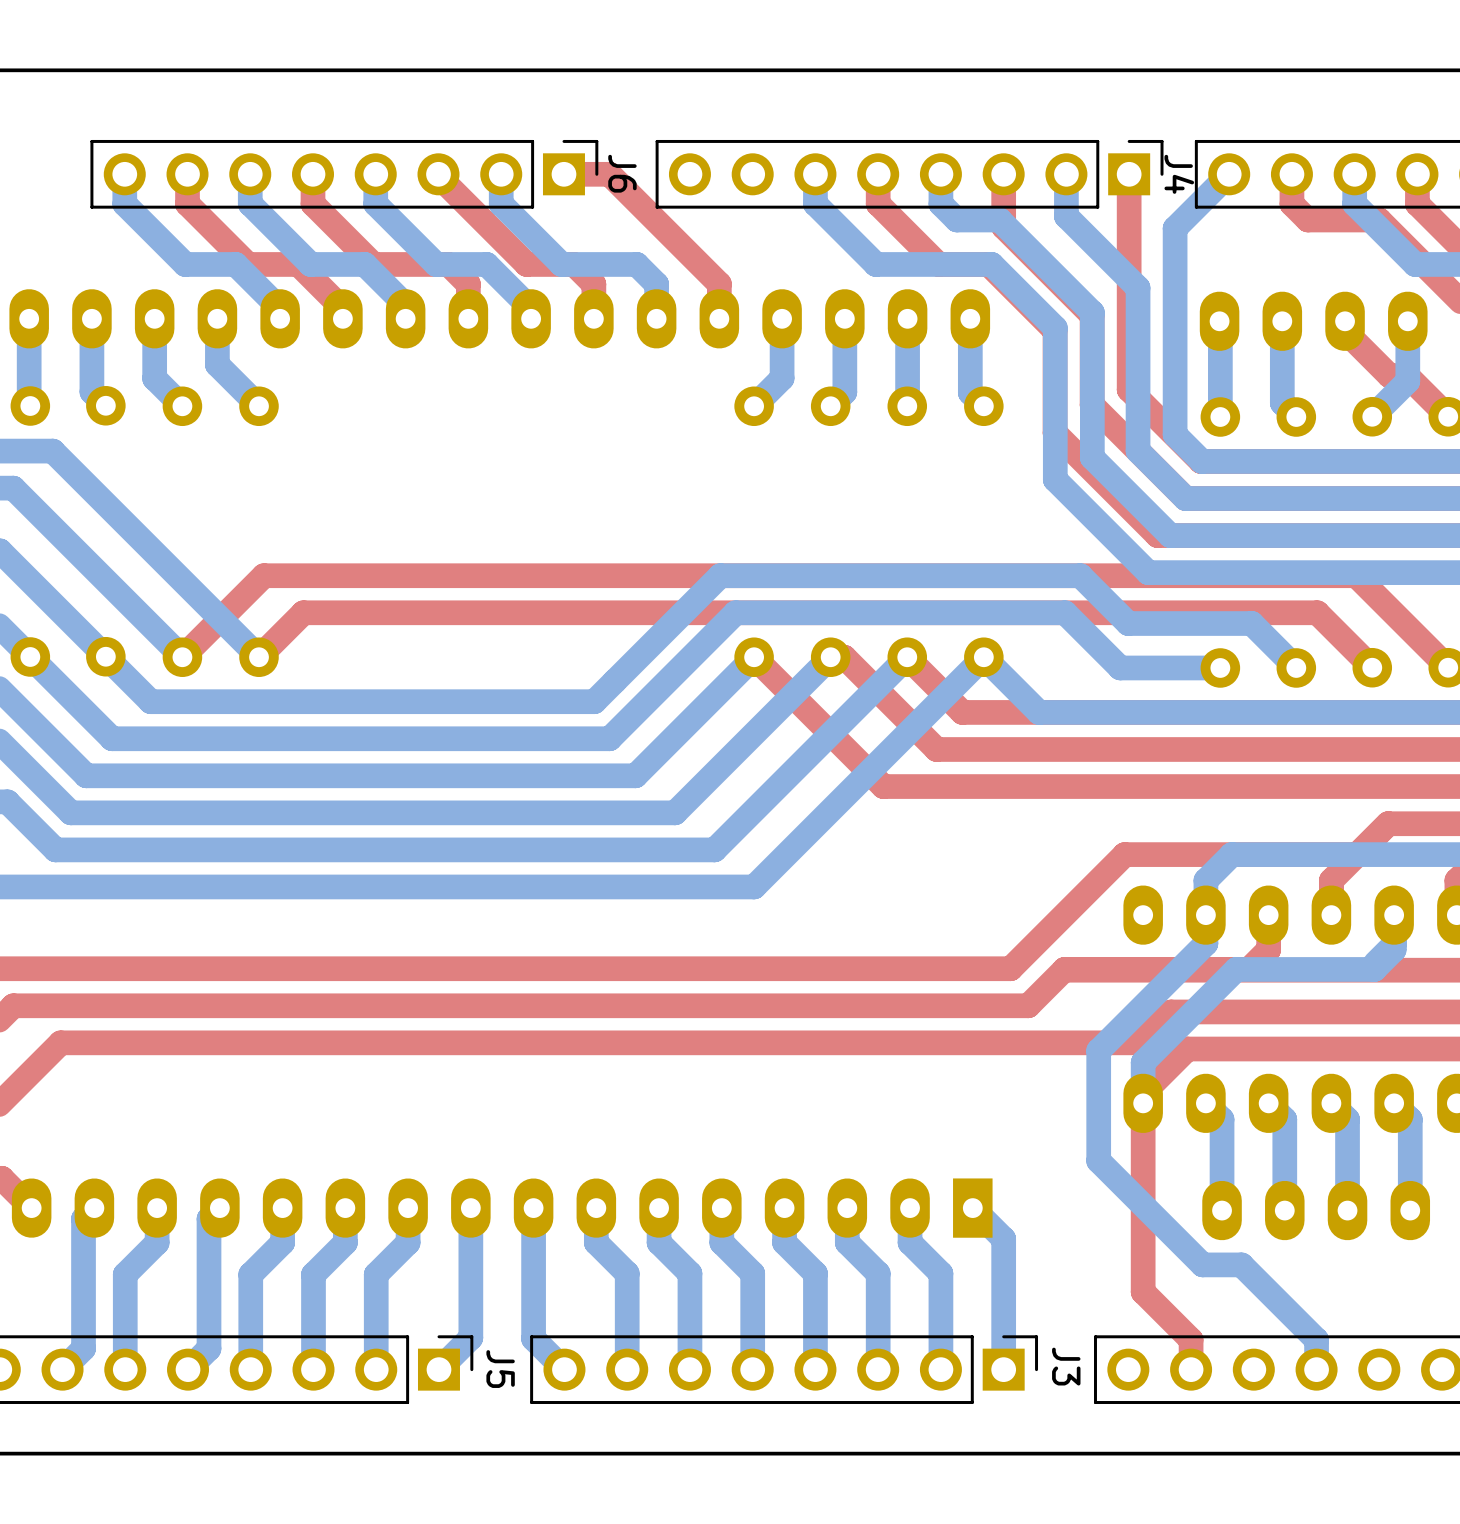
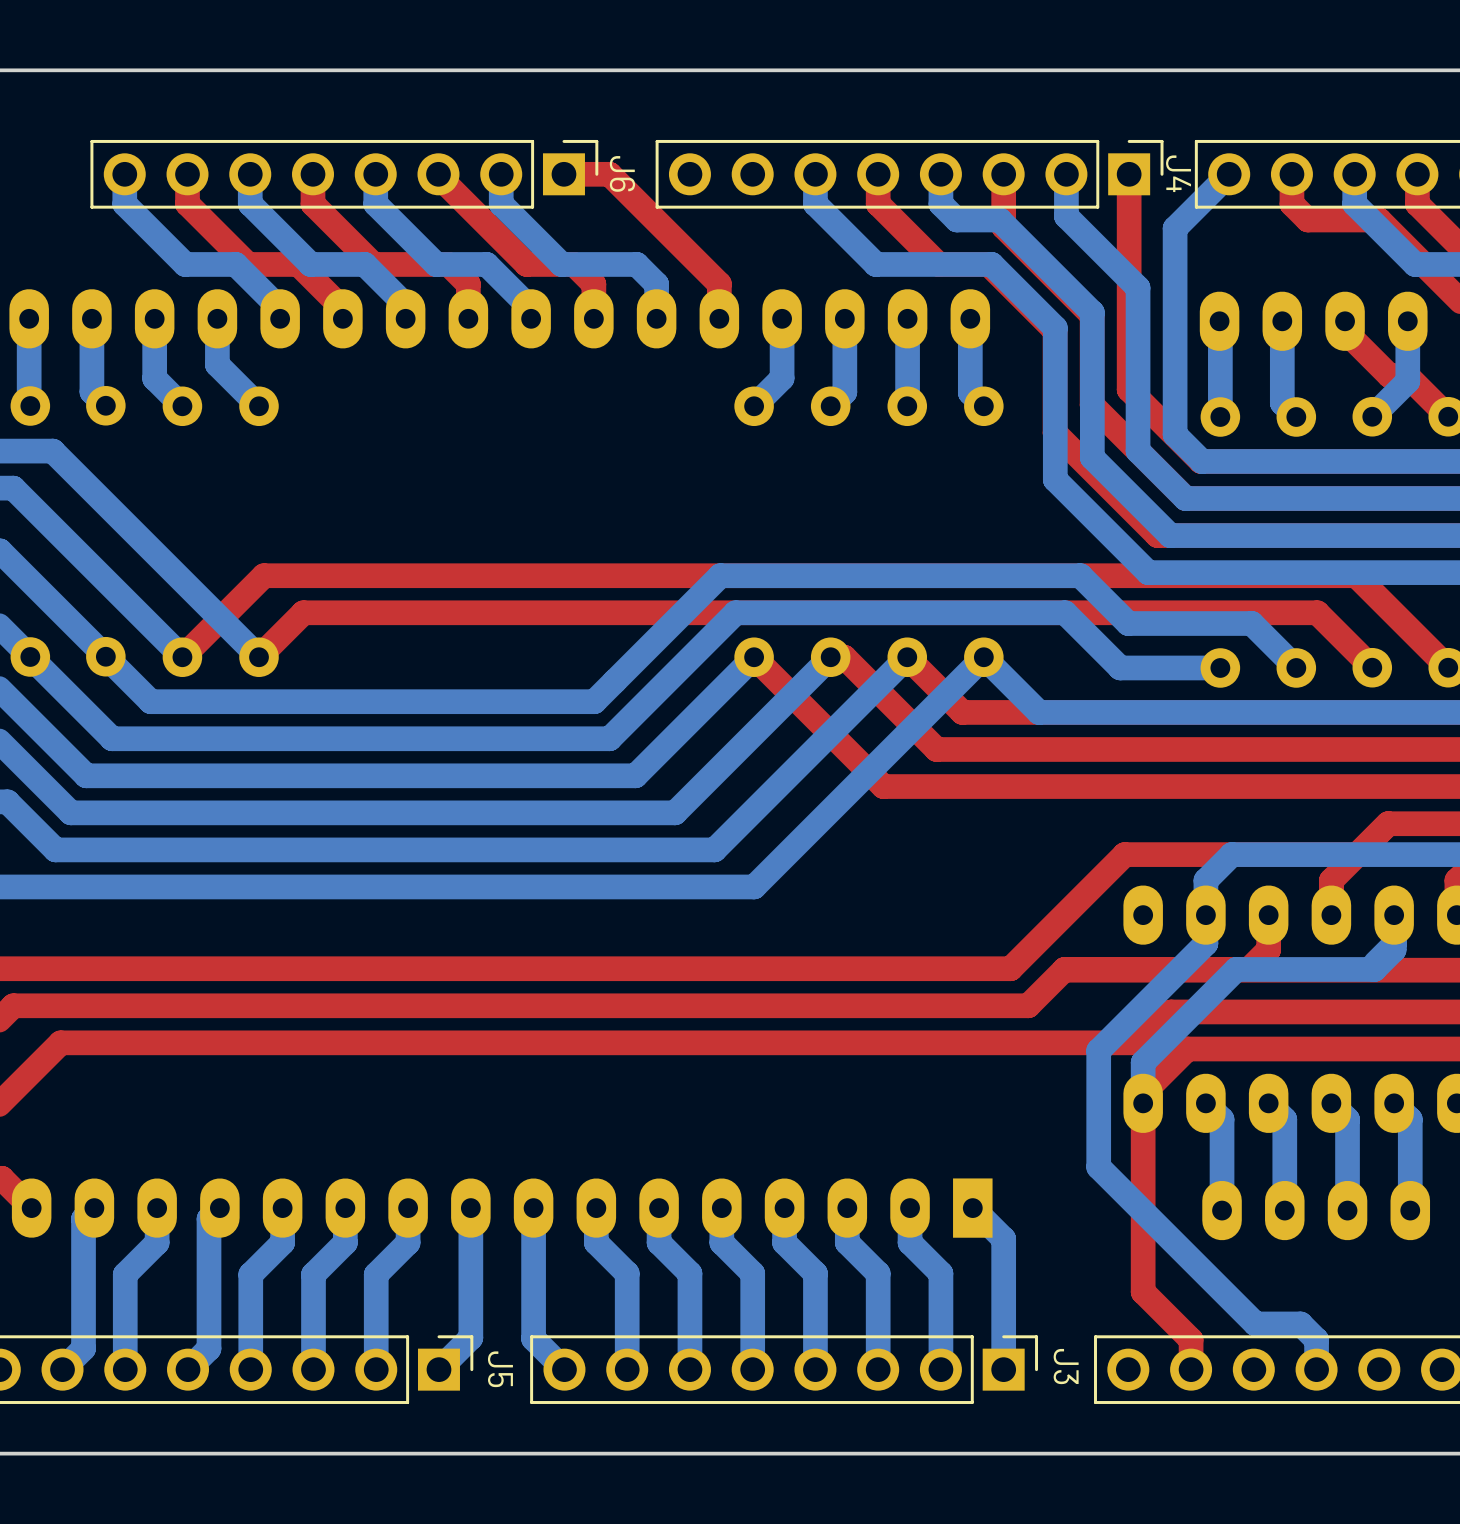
bottom track: (1098, 1160) (1202, 1264) (1241, 1264) (1300, 1323) -> (1098, 1160) (1098, 1167) (1255, 1323) (1300, 1323)

